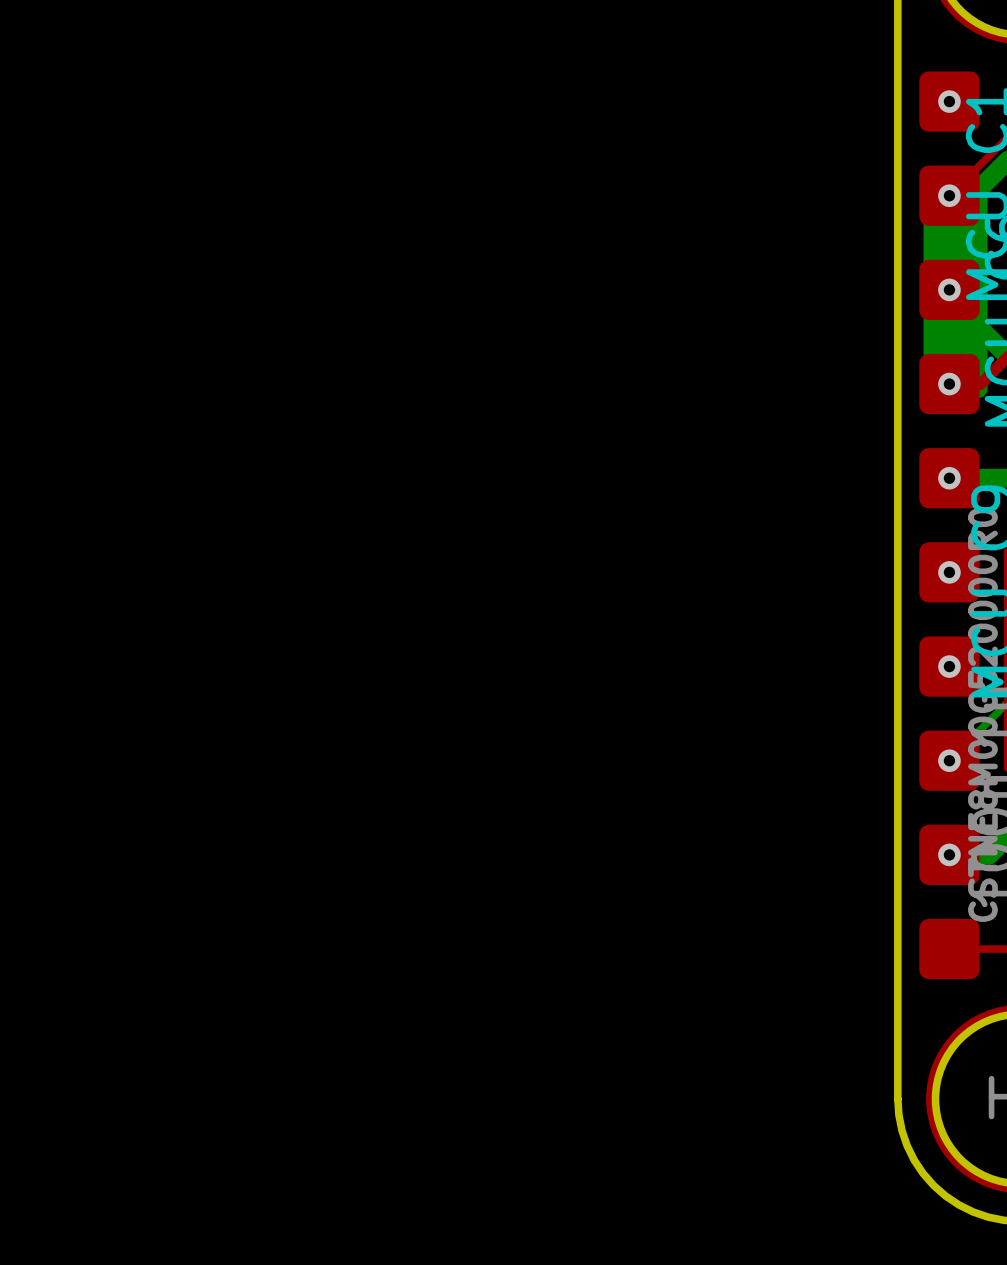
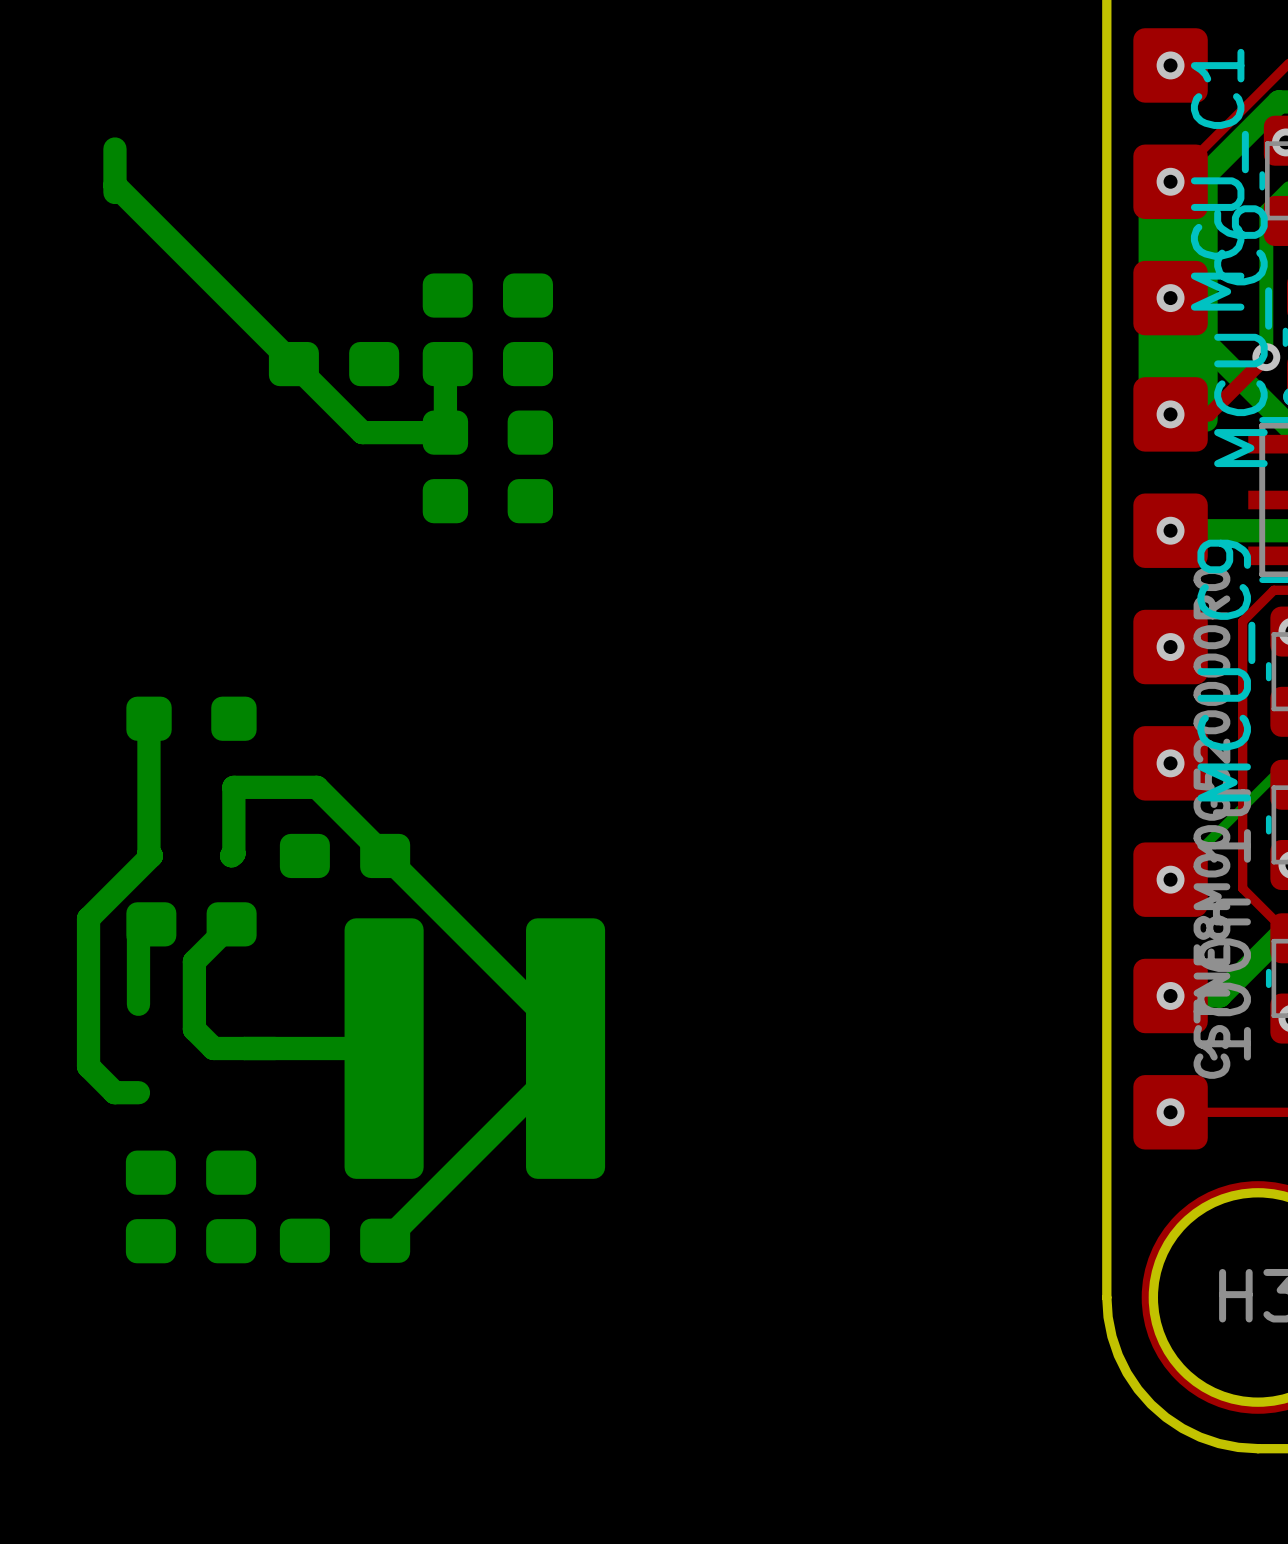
bottom track: none -> (114, 148) (114, 192)
bottom track: none -> (114, 185) (362, 432) (445, 432) (445, 366) (447, 364)
part: none -> (487, 295)
part: none -> (334, 364)
part: none -> (487, 364)
part: none -> (487, 432)
part: none -> (487, 501)
bottom track: none -> (148, 718) (148, 853) (151, 855) (88, 918) (88, 1066) (114, 1092) (138, 1092)
part: none -> (191, 718)
bottom track: none -> (231, 855) (233, 853) (233, 787) (316, 787) (564, 1034)
part: none -> (345, 855)
bottom track: none -> (151, 924) (138, 937) (138, 1004)
part: none -> (191, 924)
bottom track: none -> (231, 924) (194, 961) (194, 1029) (213, 1048) (382, 1048)
part: none -> (474, 1048)
bottom track: none -> (564, 1062) (385, 1241)
via: none -> (1170, 1112)
part: none -> (191, 1172)
part: none -> (191, 1241)
part: none -> (345, 1240)

